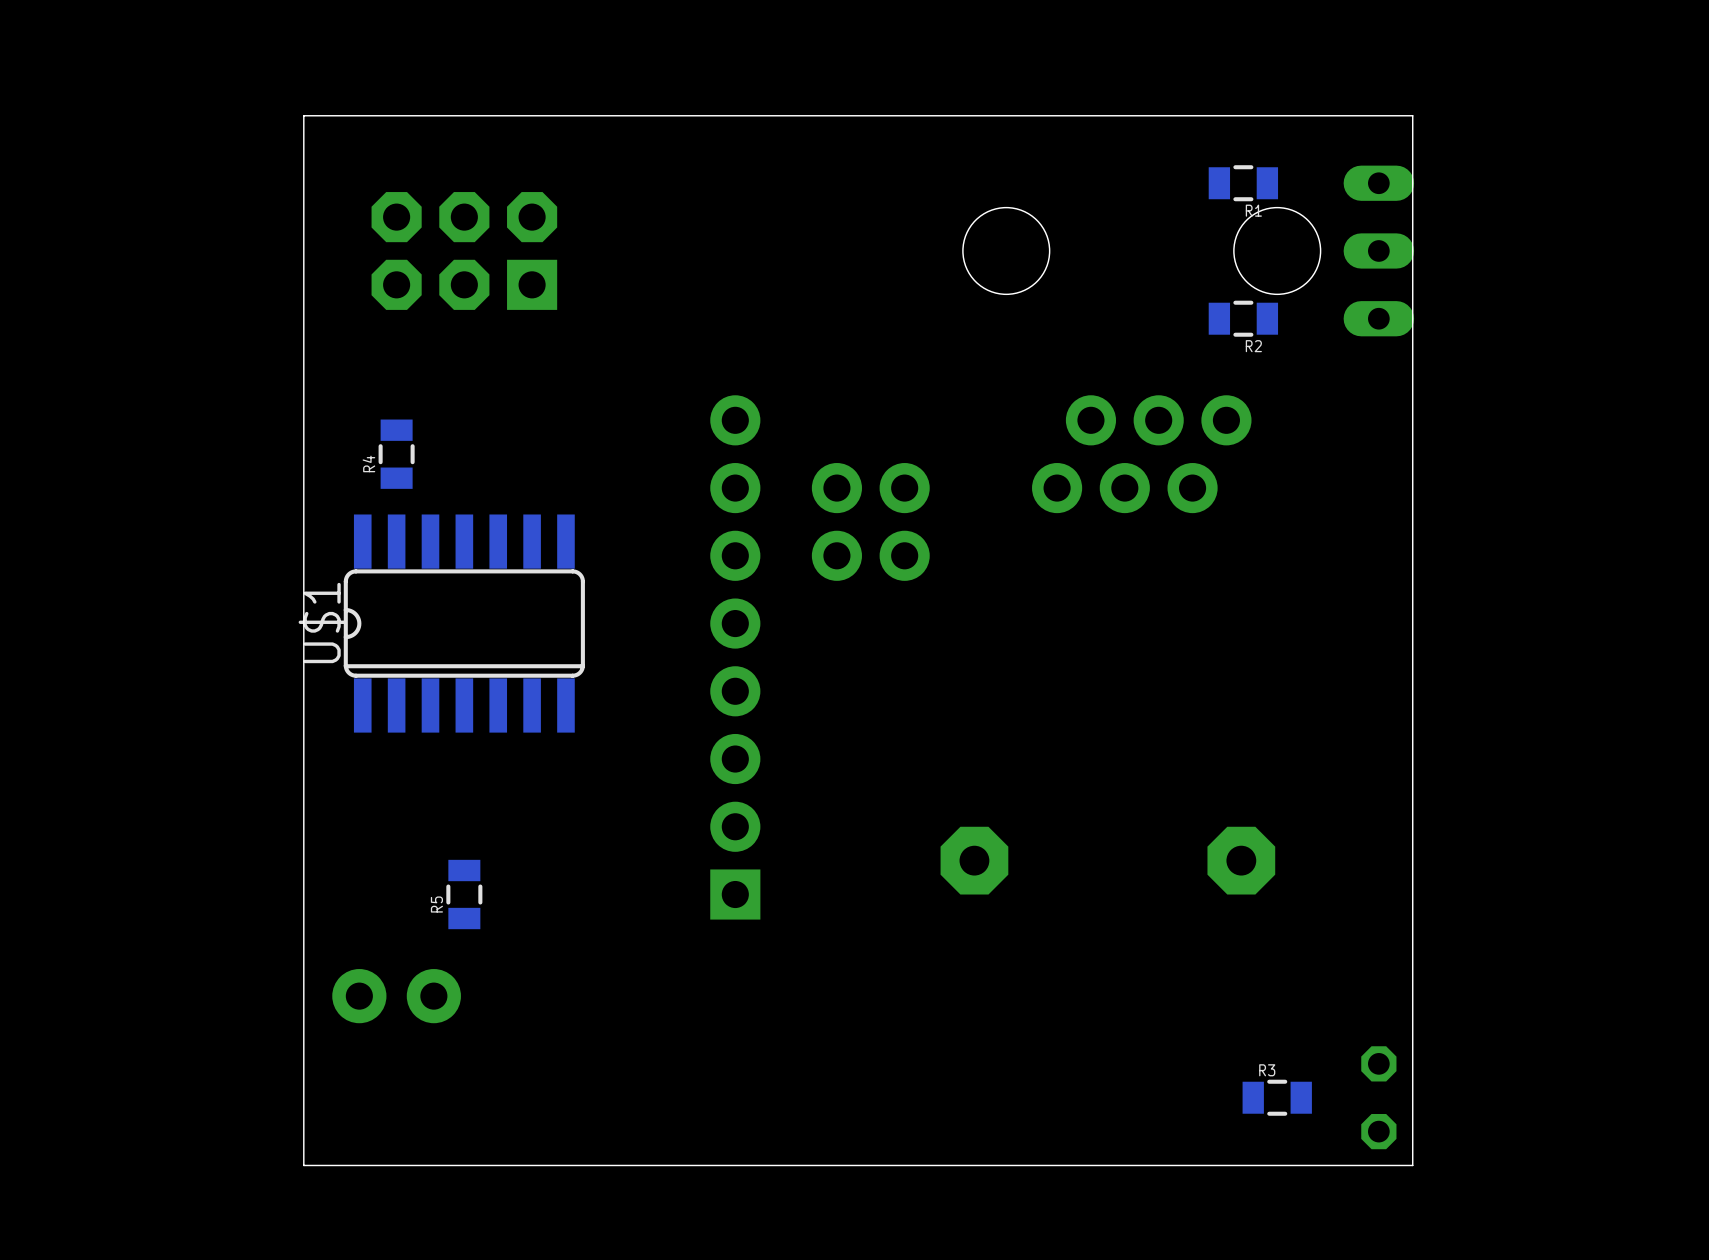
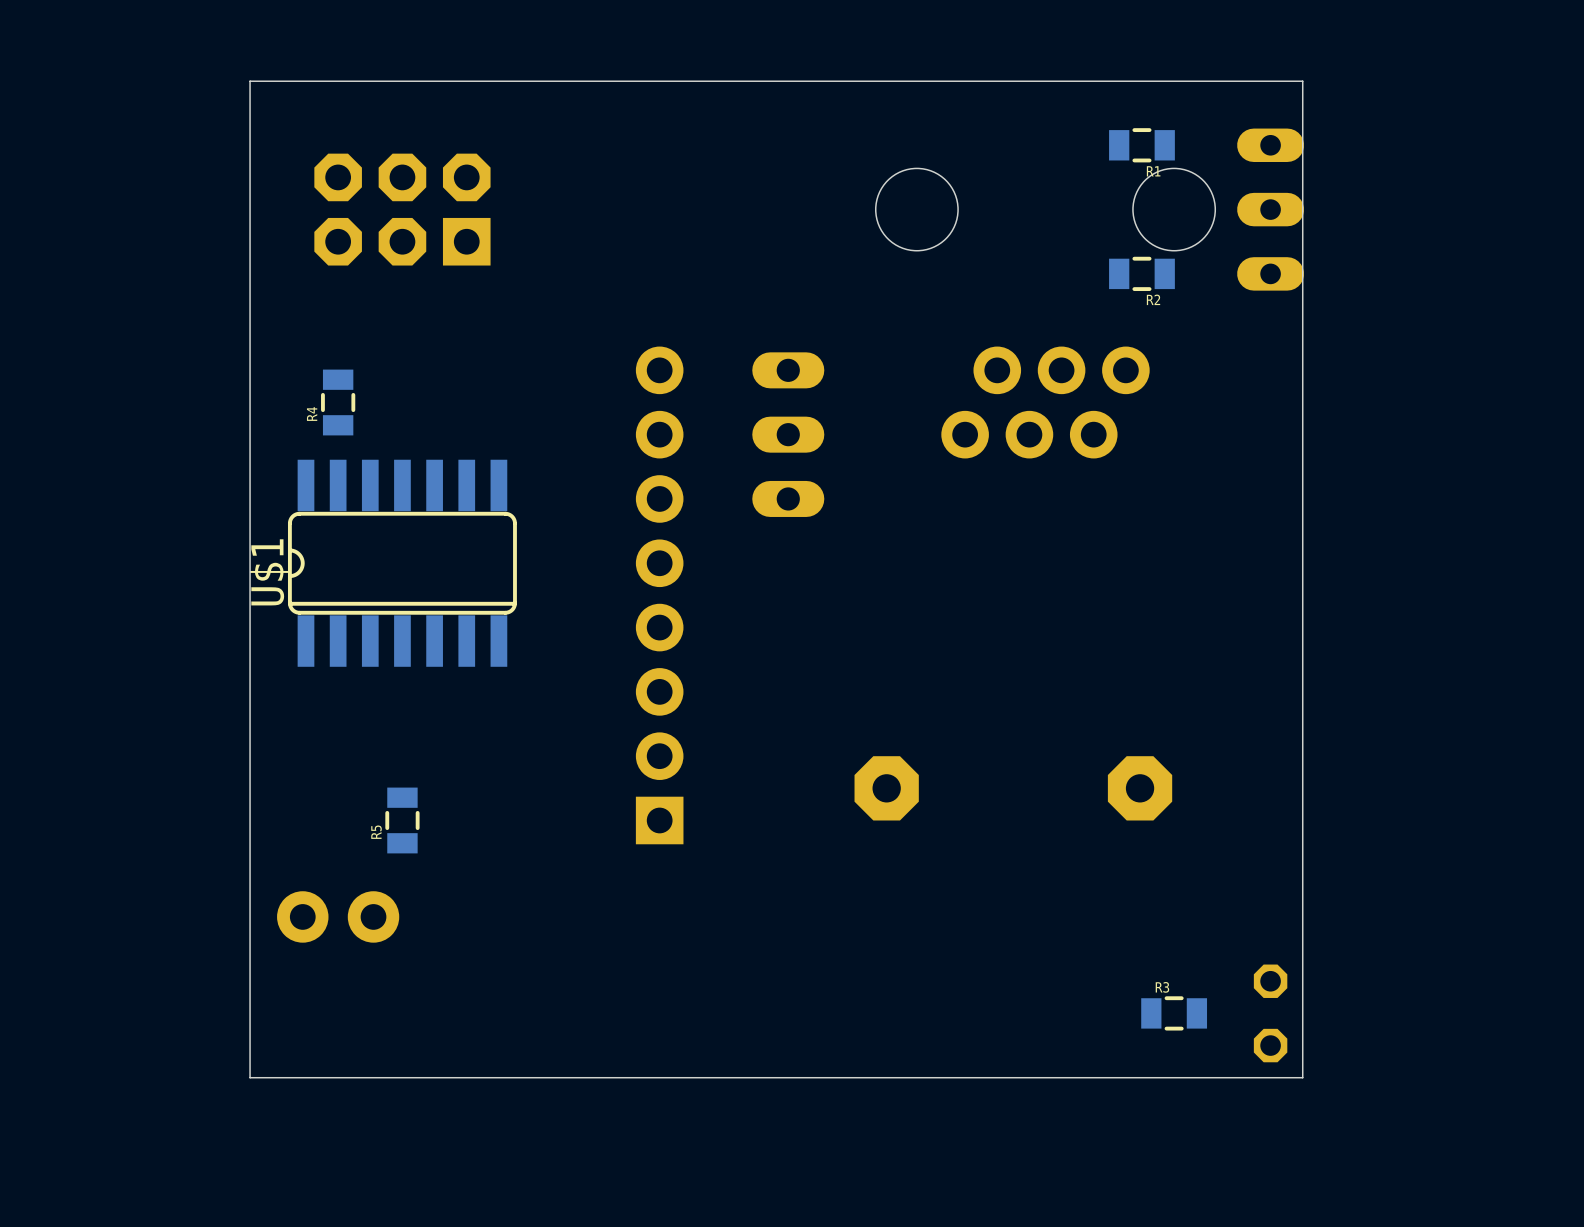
part: none -> (788, 434)
part: (836, 521) -> none
part: (904, 521) -> none

